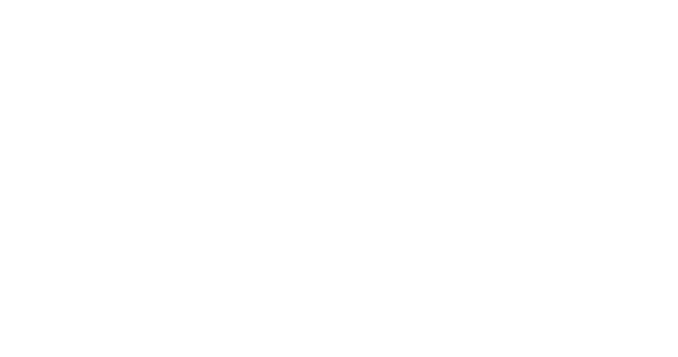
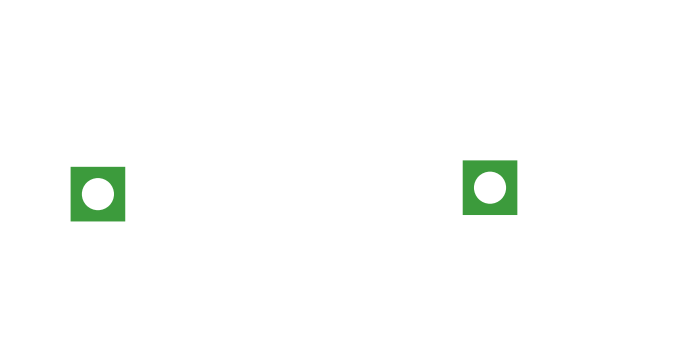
part: none -> (490, 187)
part: none -> (97, 194)

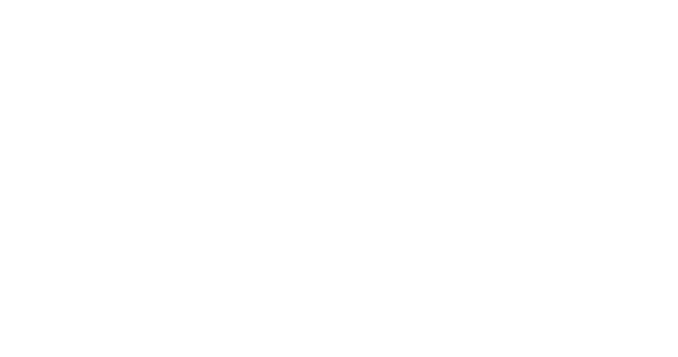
part: (490, 187) -> none
part: (97, 194) -> none

